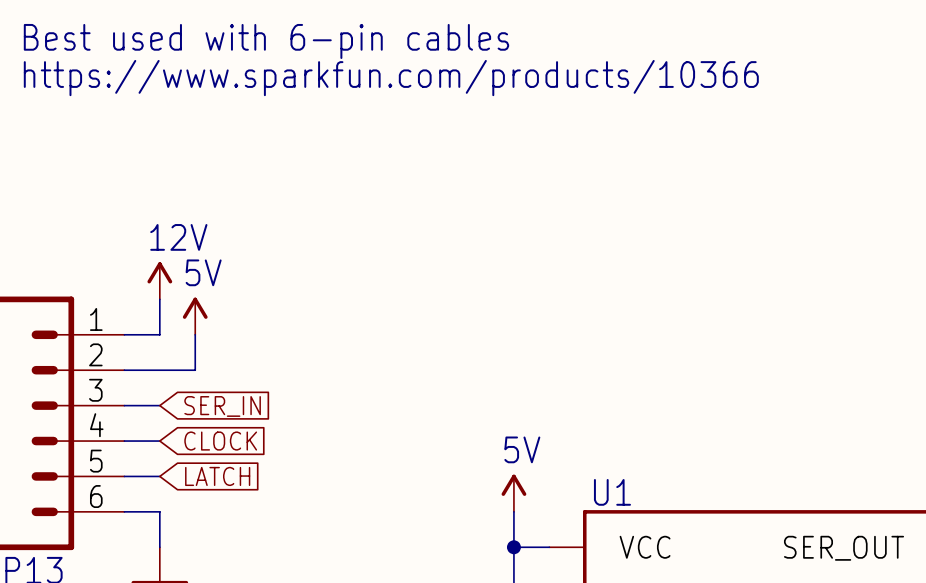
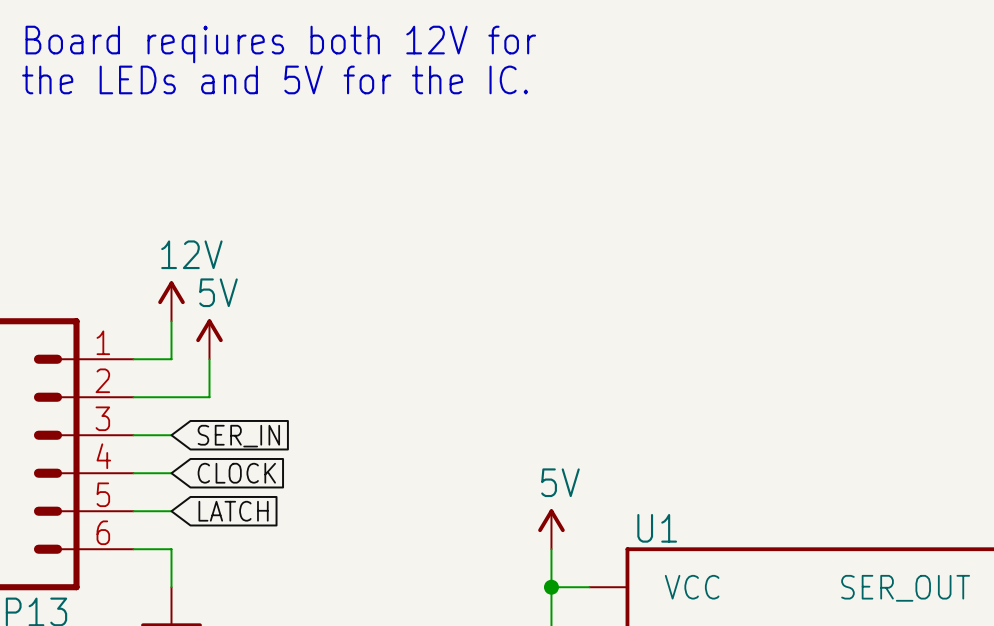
text: Best used with 6-pin cables (266, 41) -> Board reqiures both 12V for (280, 44)
text: https://www.sparkfun.com/products/10366 (391, 78) -> the LEDs and 5V for the IC. (275, 79)

